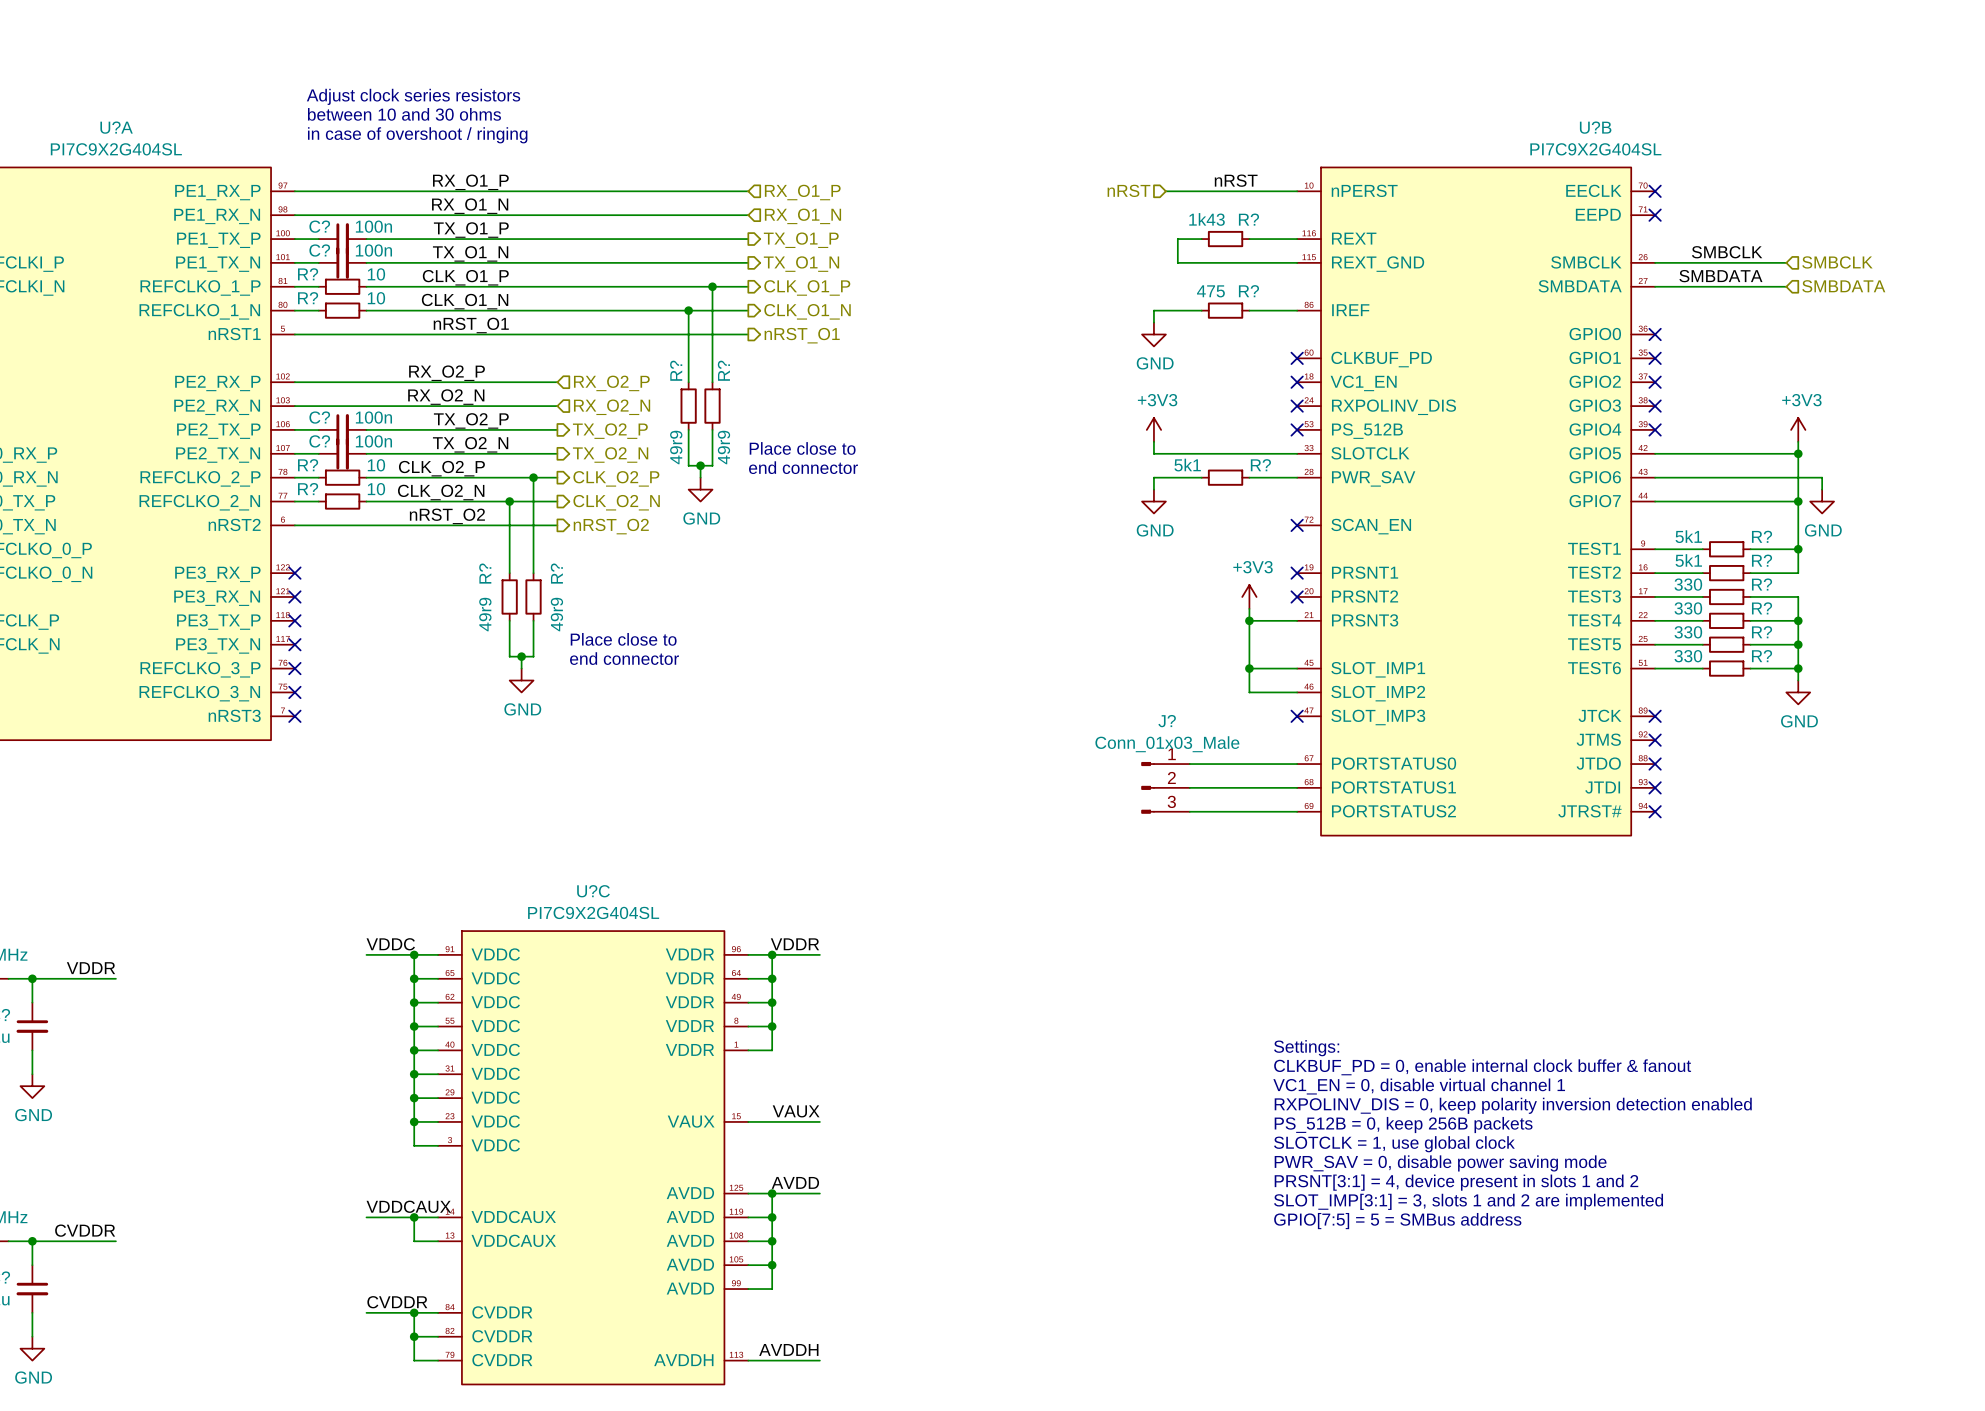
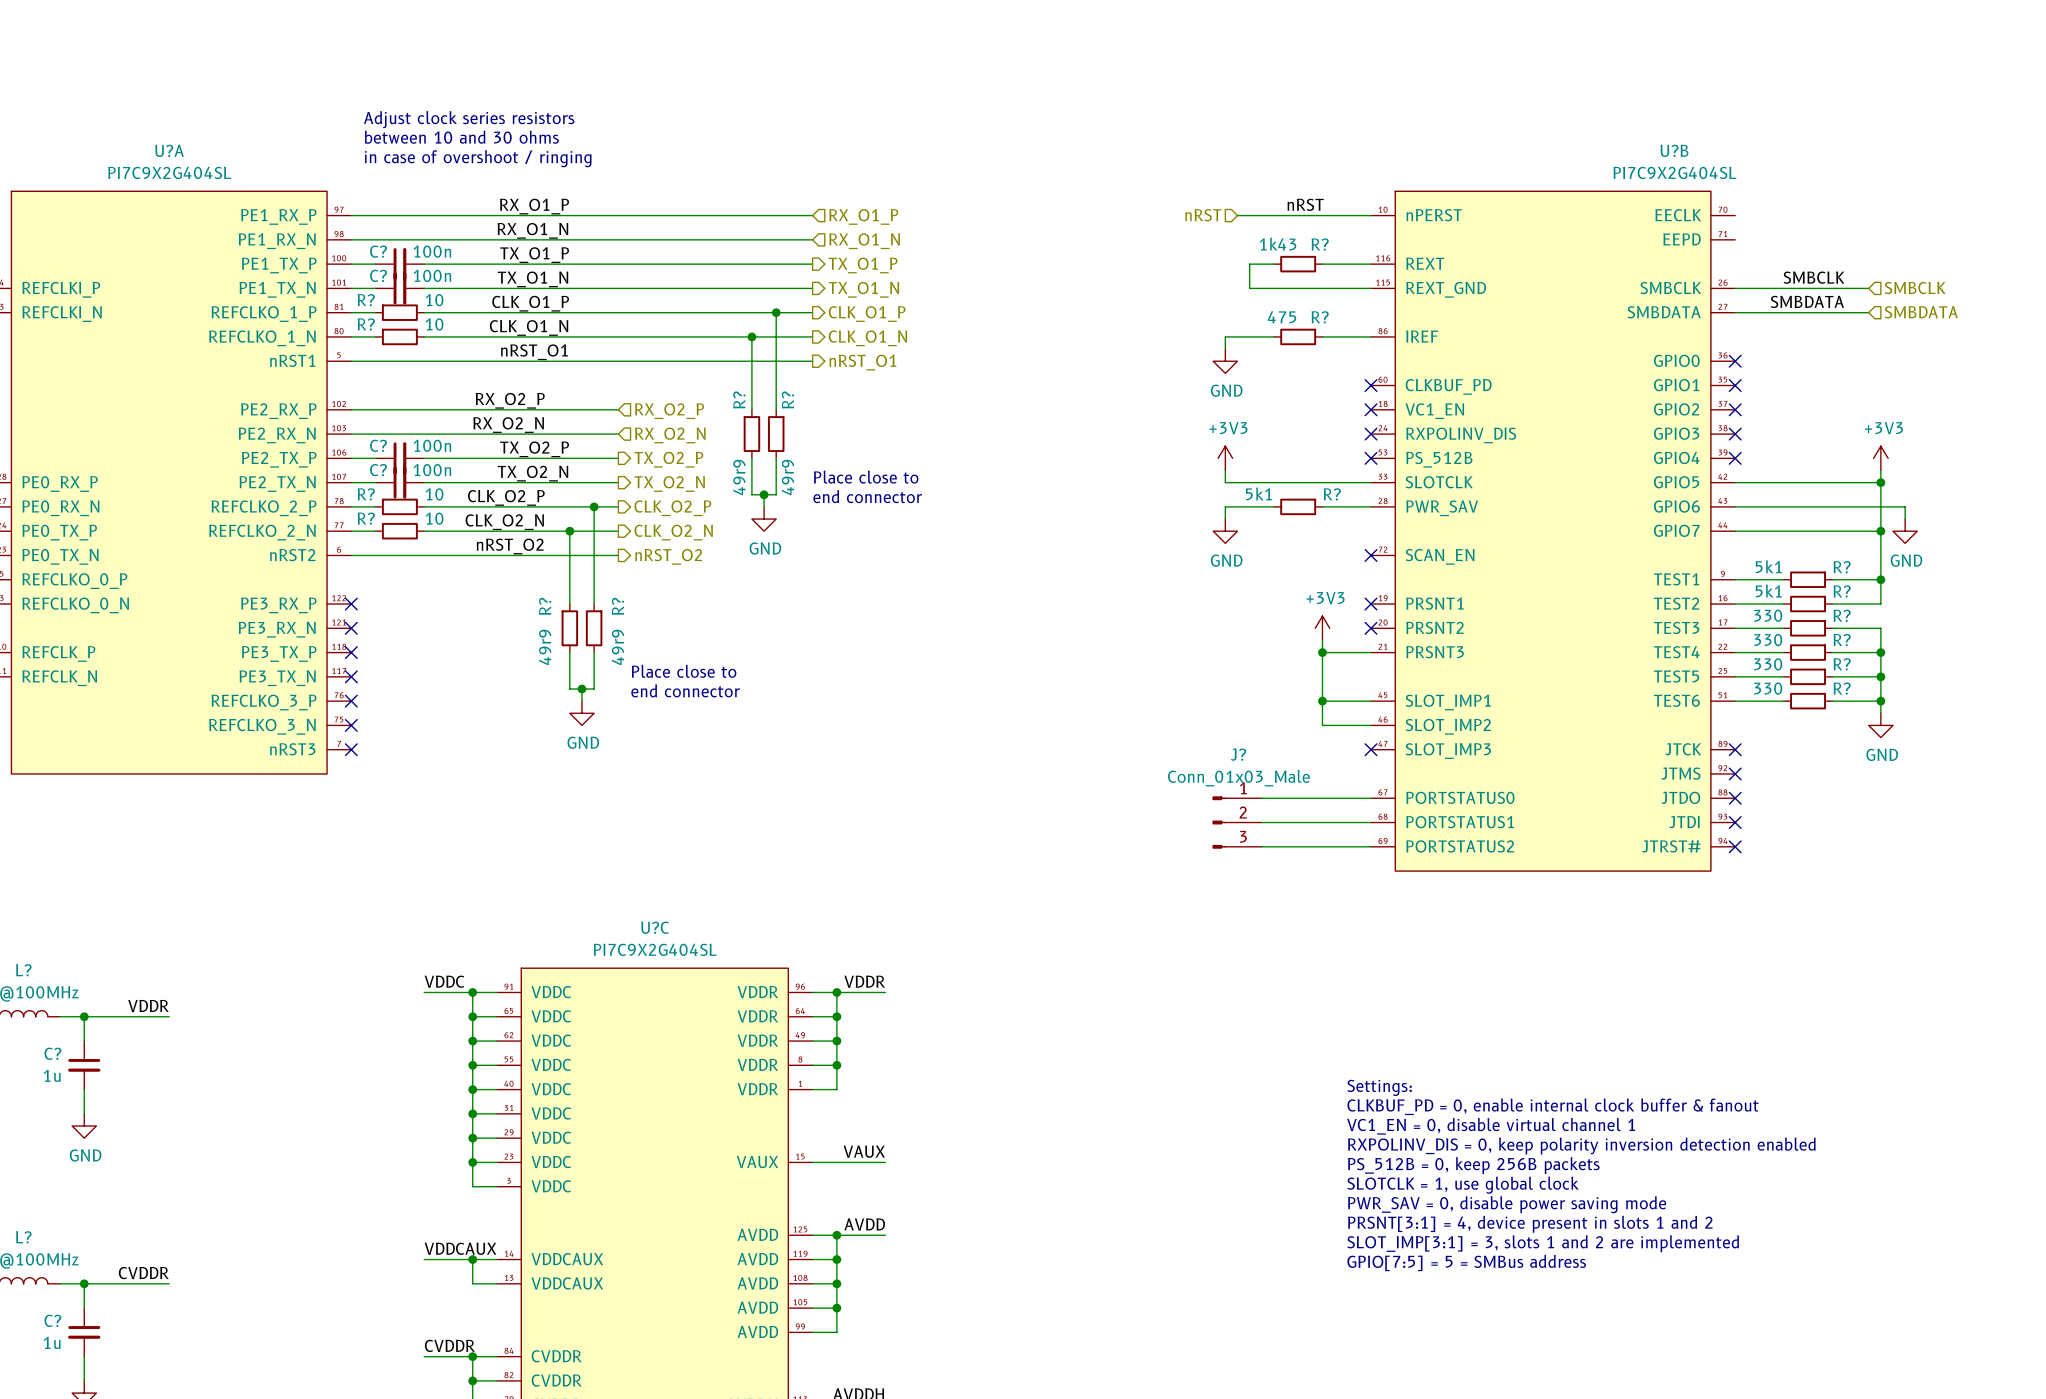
no-connect mark: (1655, 191) -> none
no-connect mark: (1655, 215) -> none

